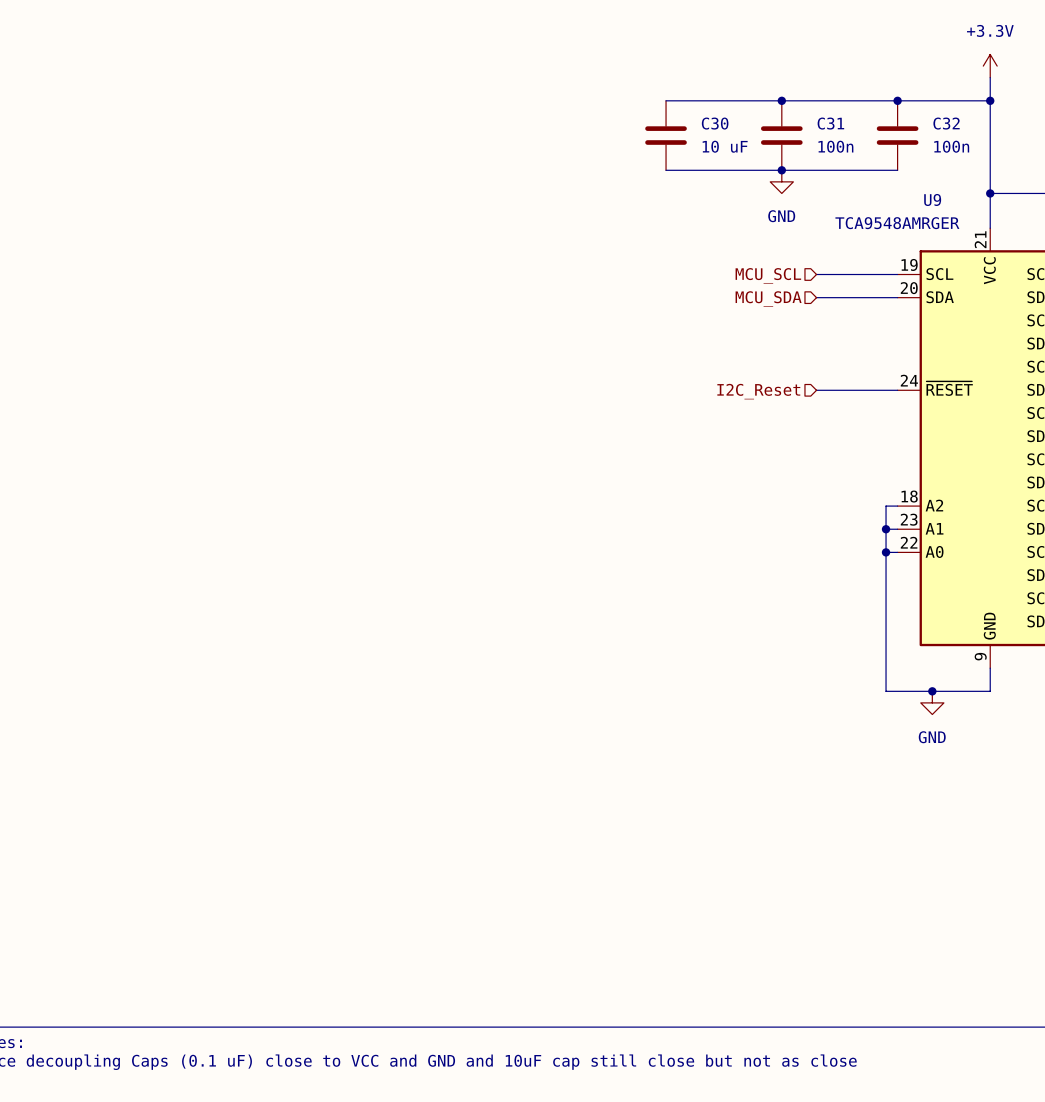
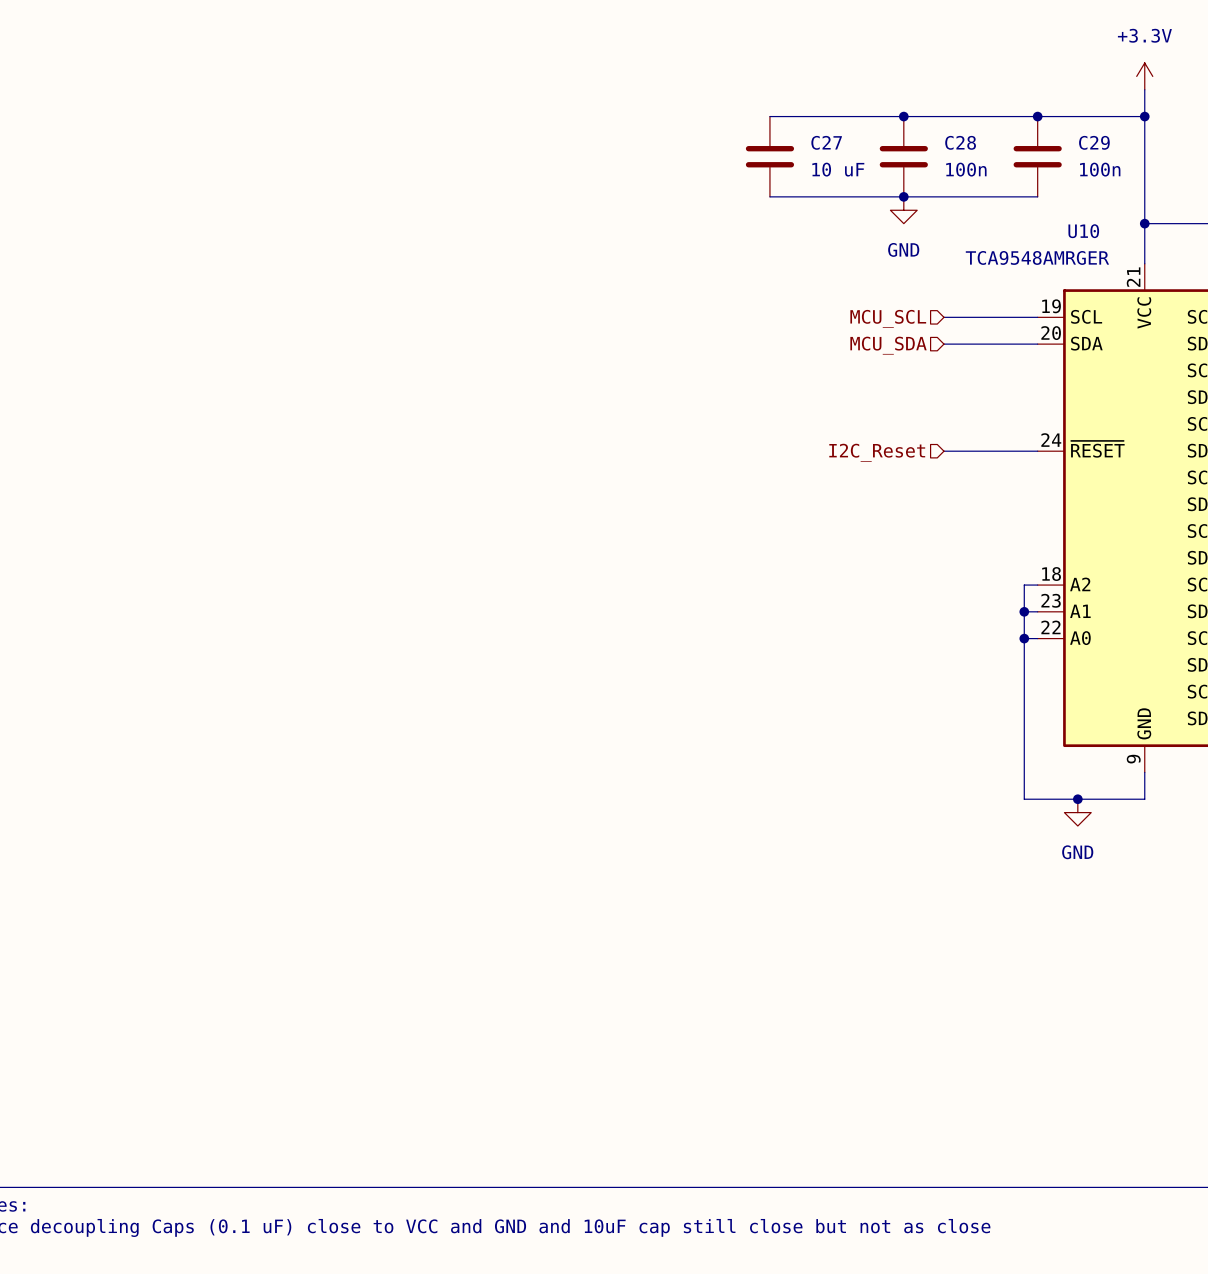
C30 name: C30 (715, 123) -> C27 (826, 142)
C31 name: C31 (830, 123) -> C28 (960, 142)
C32 name: C32 (946, 123) -> C29 (1094, 142)
U9 name: U9 (932, 199) -> U10 (1083, 231)

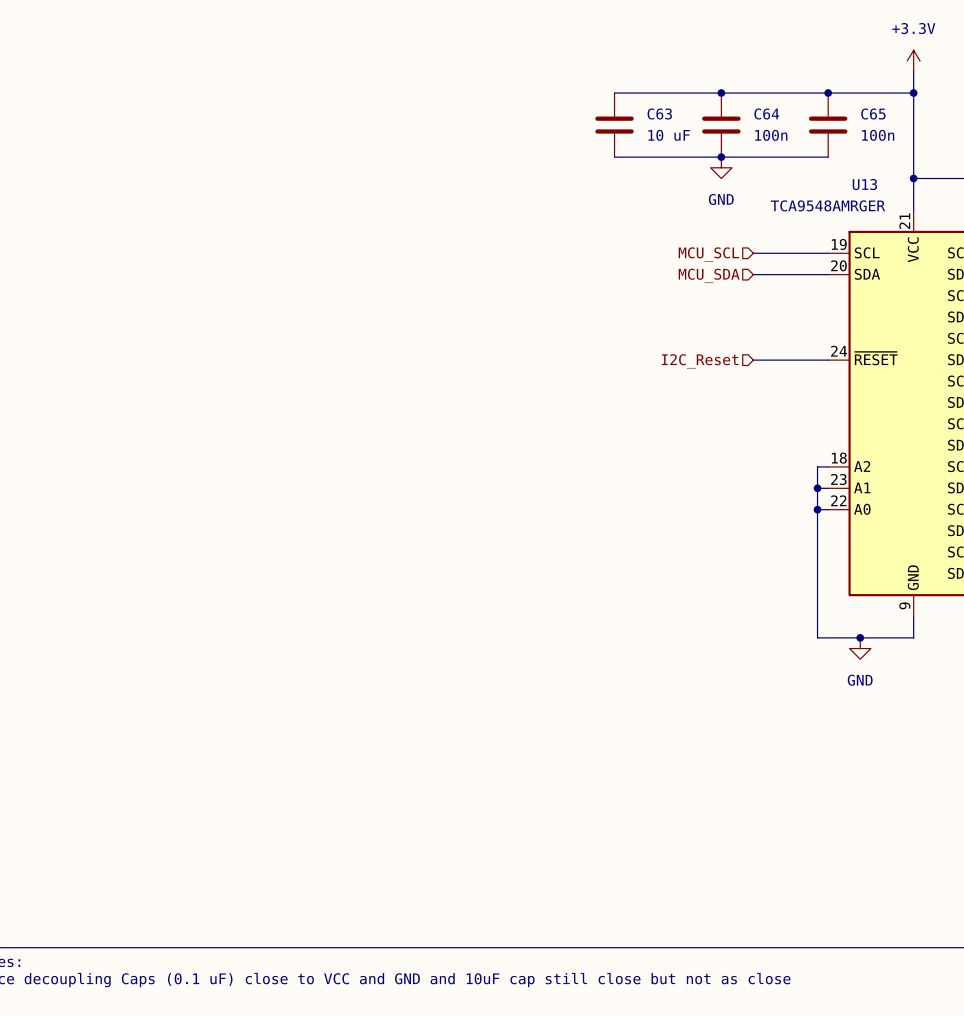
C27 name: C27 (826, 142) -> C63 (659, 114)
C28 name: C28 (960, 142) -> C64 (766, 114)
C29 name: C29 (1094, 142) -> C65 (873, 114)
U10 name: U10 (1083, 231) -> U13 (864, 184)

